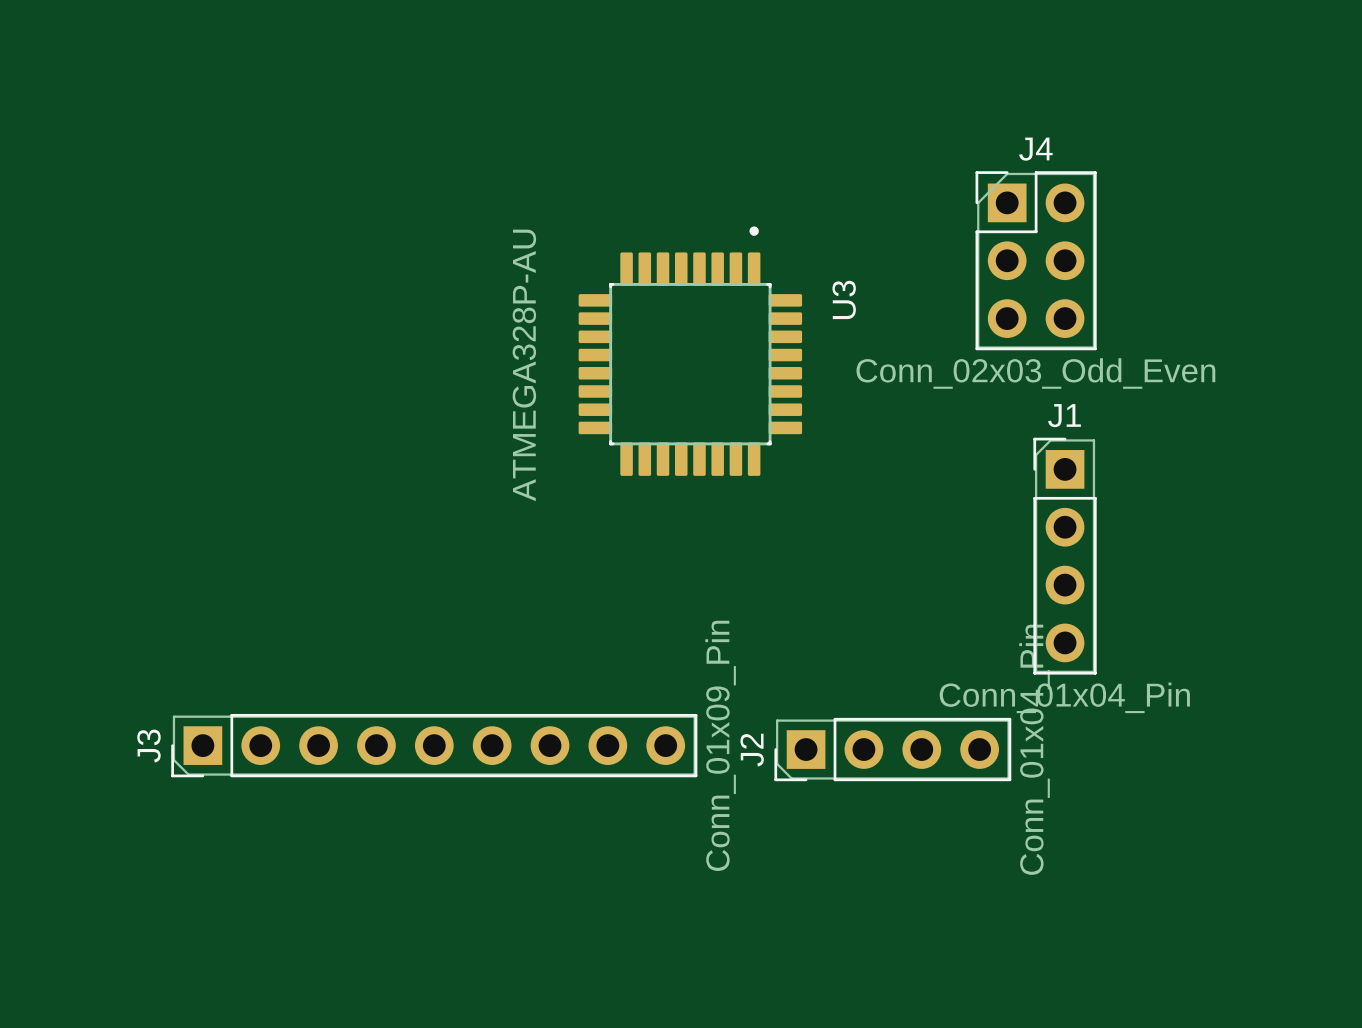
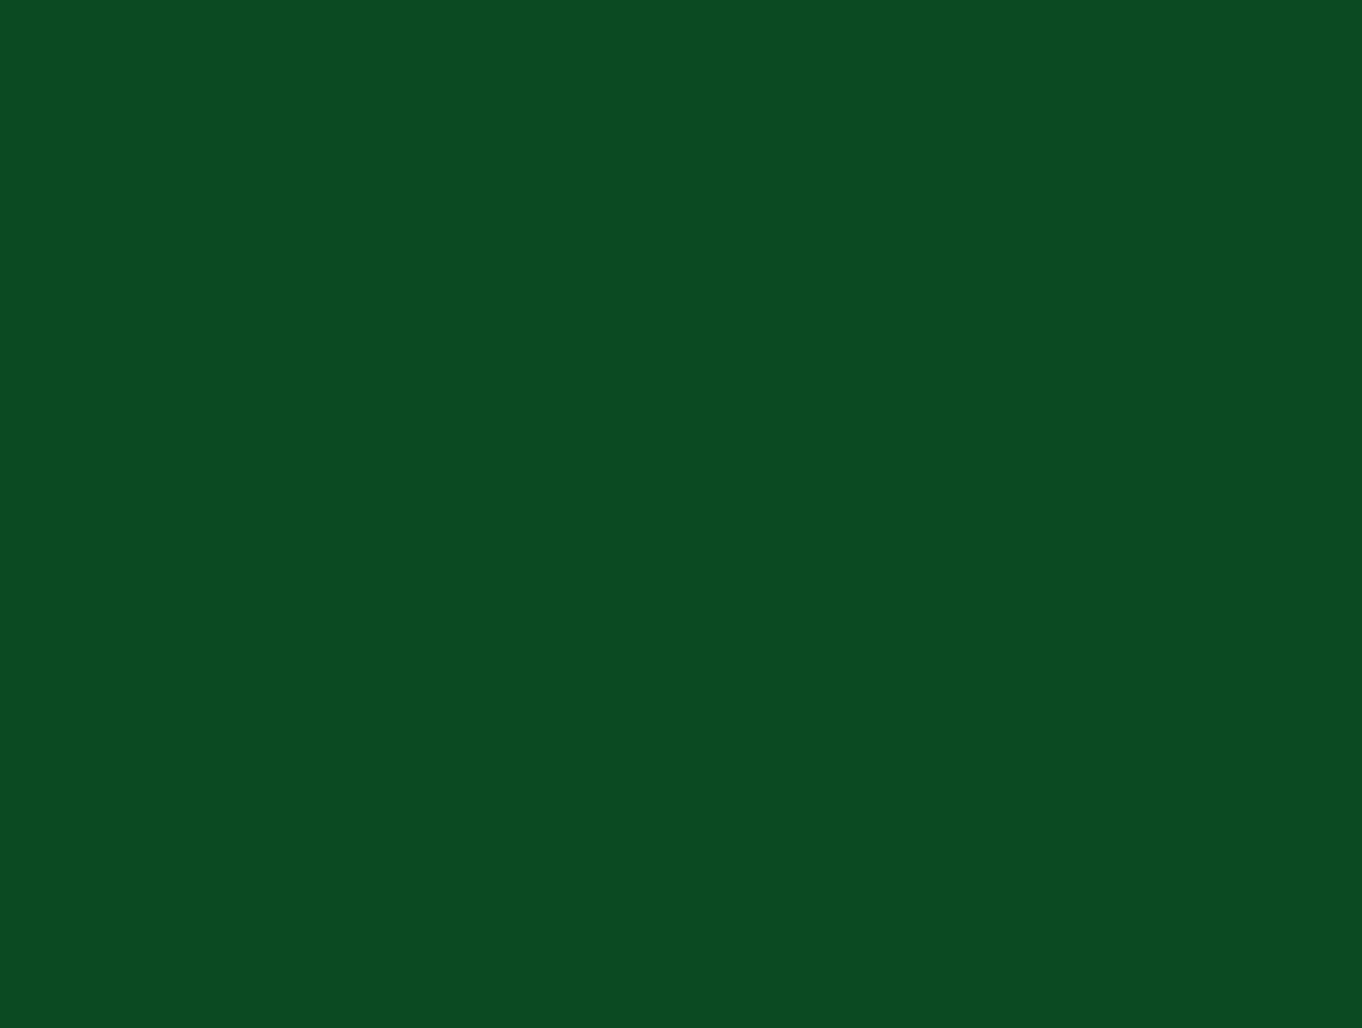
J4: Conn_02x03_Odd_Even (1036, 260) -> none
U3: ATMEGA328P-AU (690, 351) -> none
J1: Conn_01x04_Pin (1065, 556) -> none
J3: Conn_01x09_Pin (434, 745) -> none
J2: Conn_01x04_Pin (892, 749) -> none

